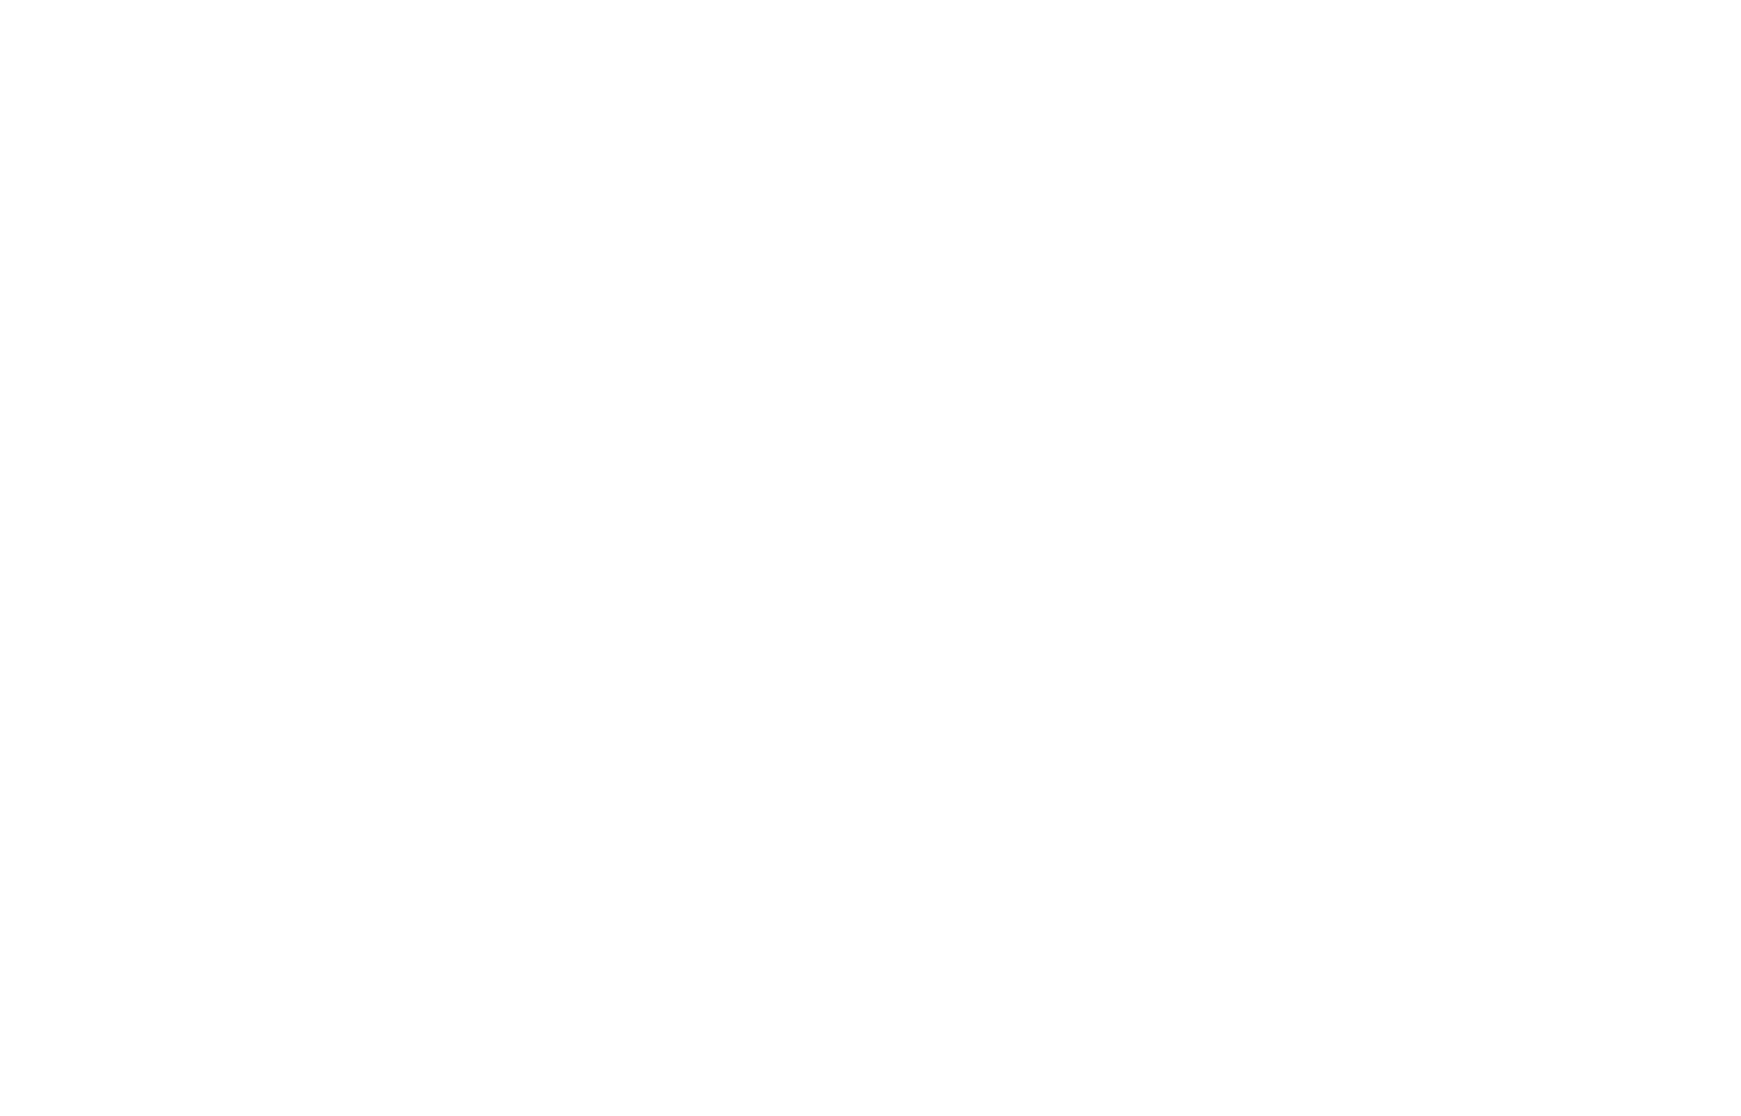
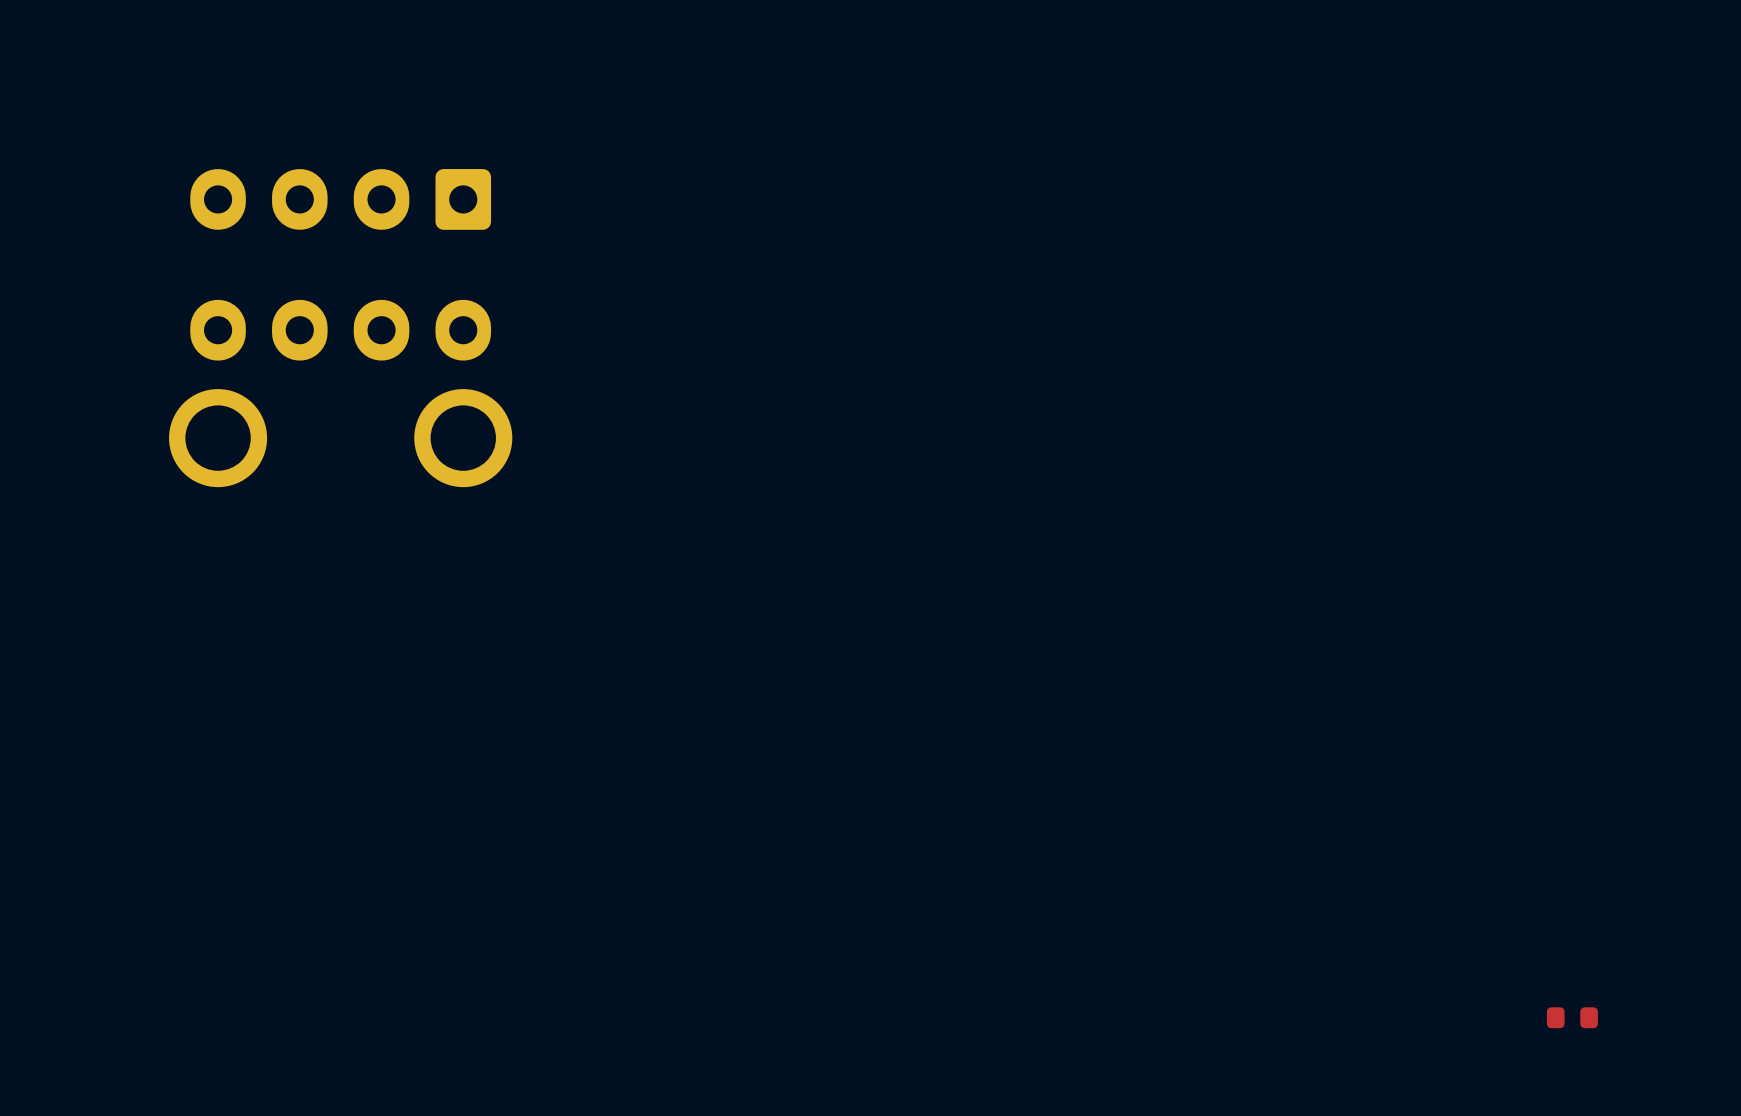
part: none -> (340, 328)
part: none -> (1572, 1017)

